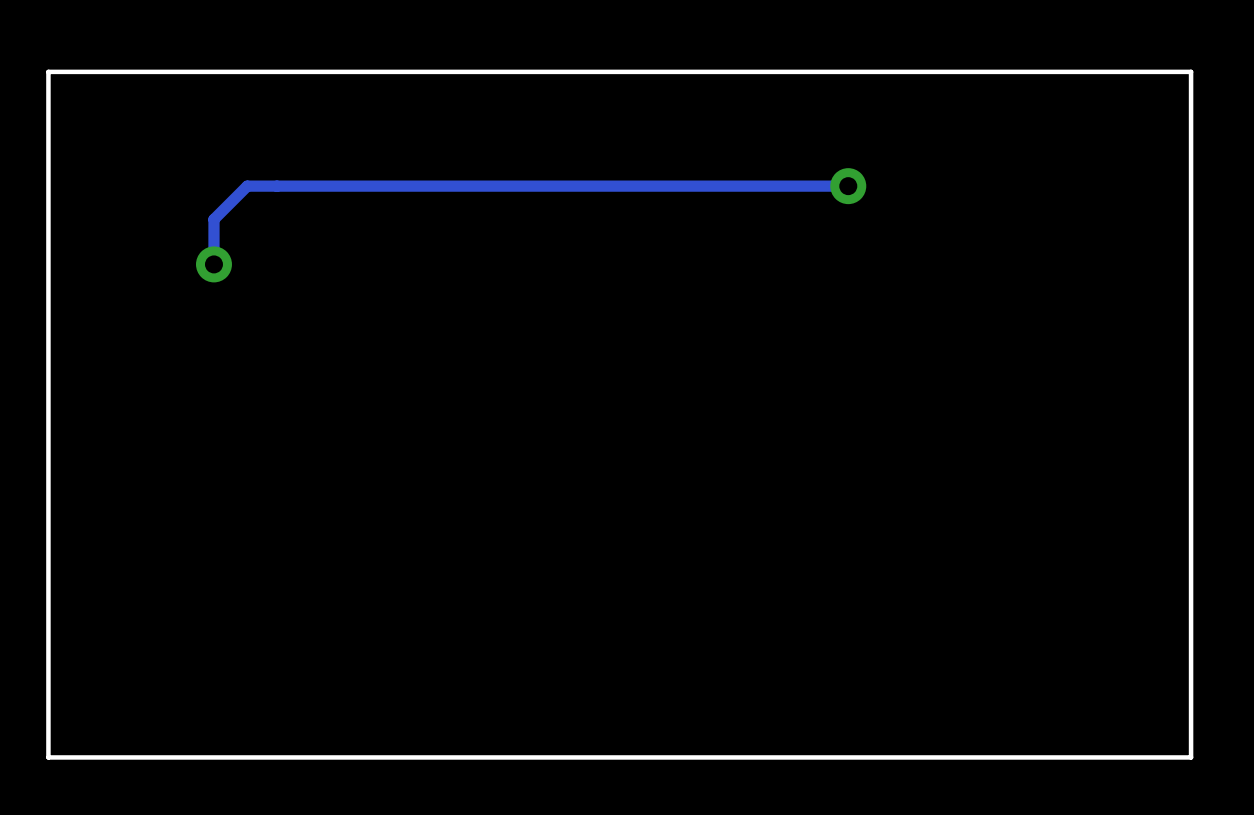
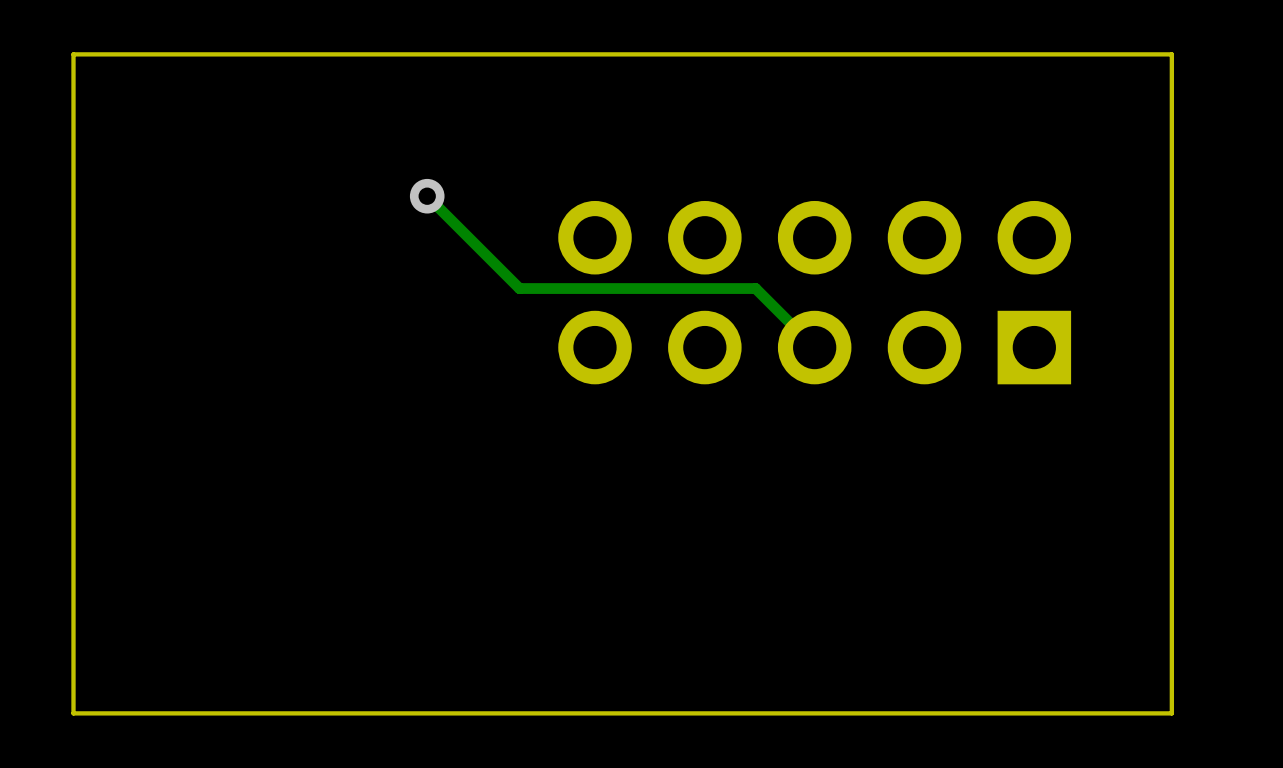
track: (848, 186) (247, 186) (213, 219) (213, 264) -> none
via: (848, 186) -> none
track: none -> (427, 196) (519, 288) (755, 288) (814, 347)
via position: (213, 264) -> (427, 196)
part: none -> (814, 292)

